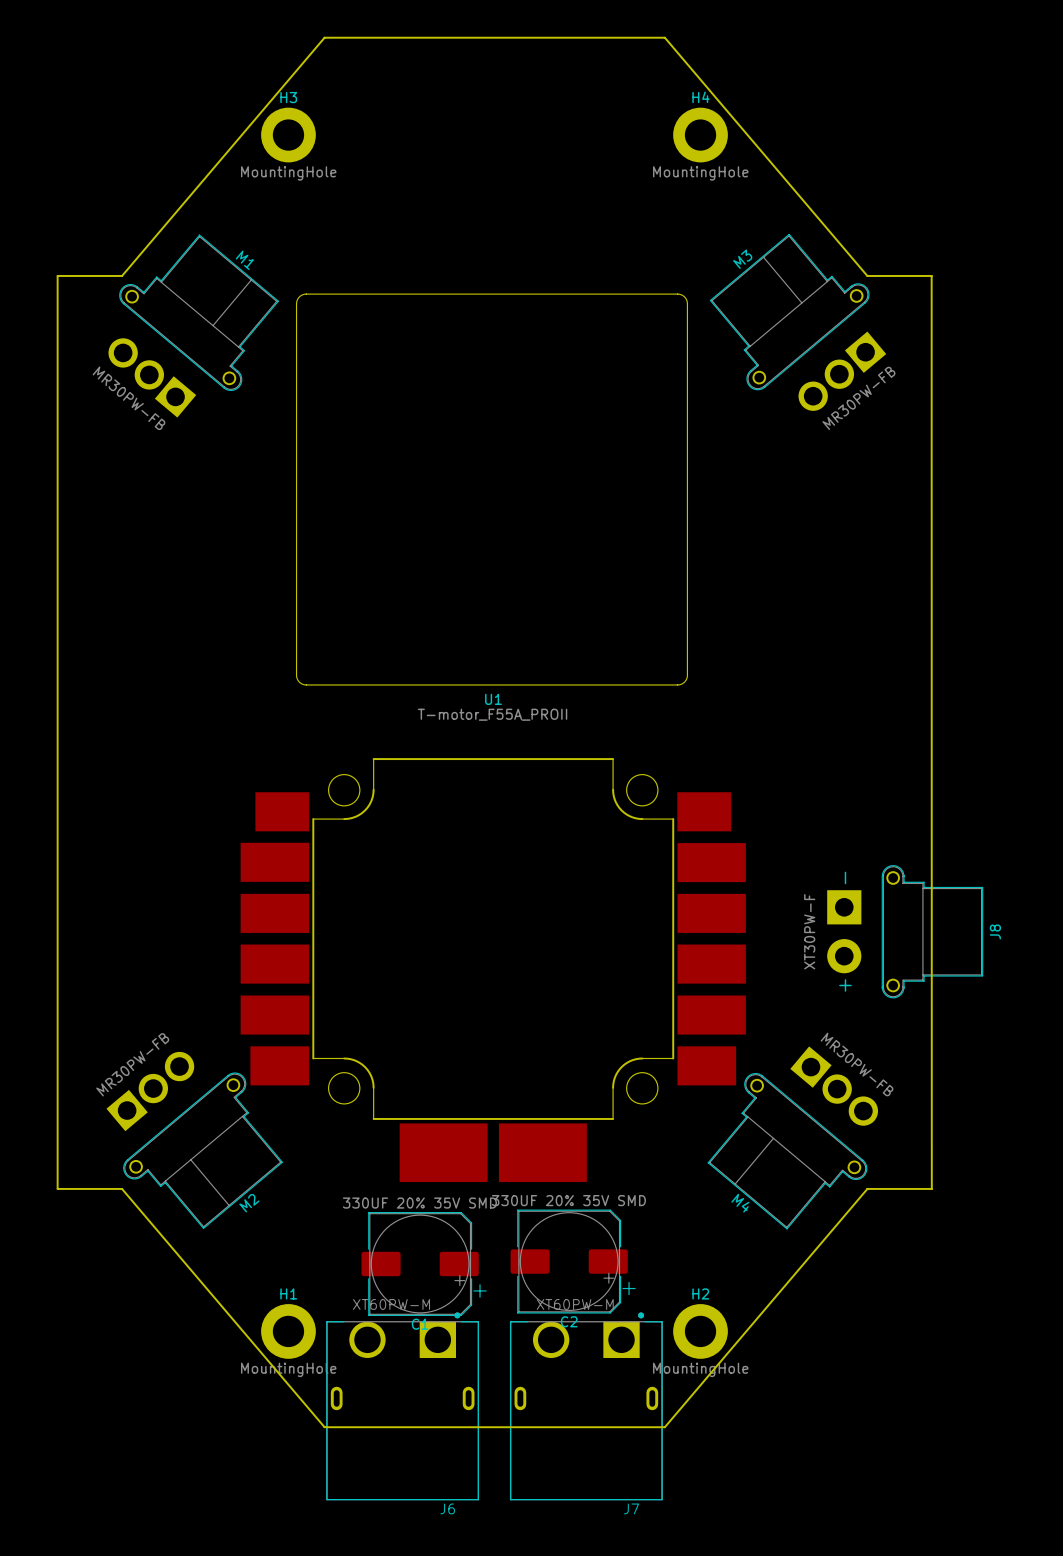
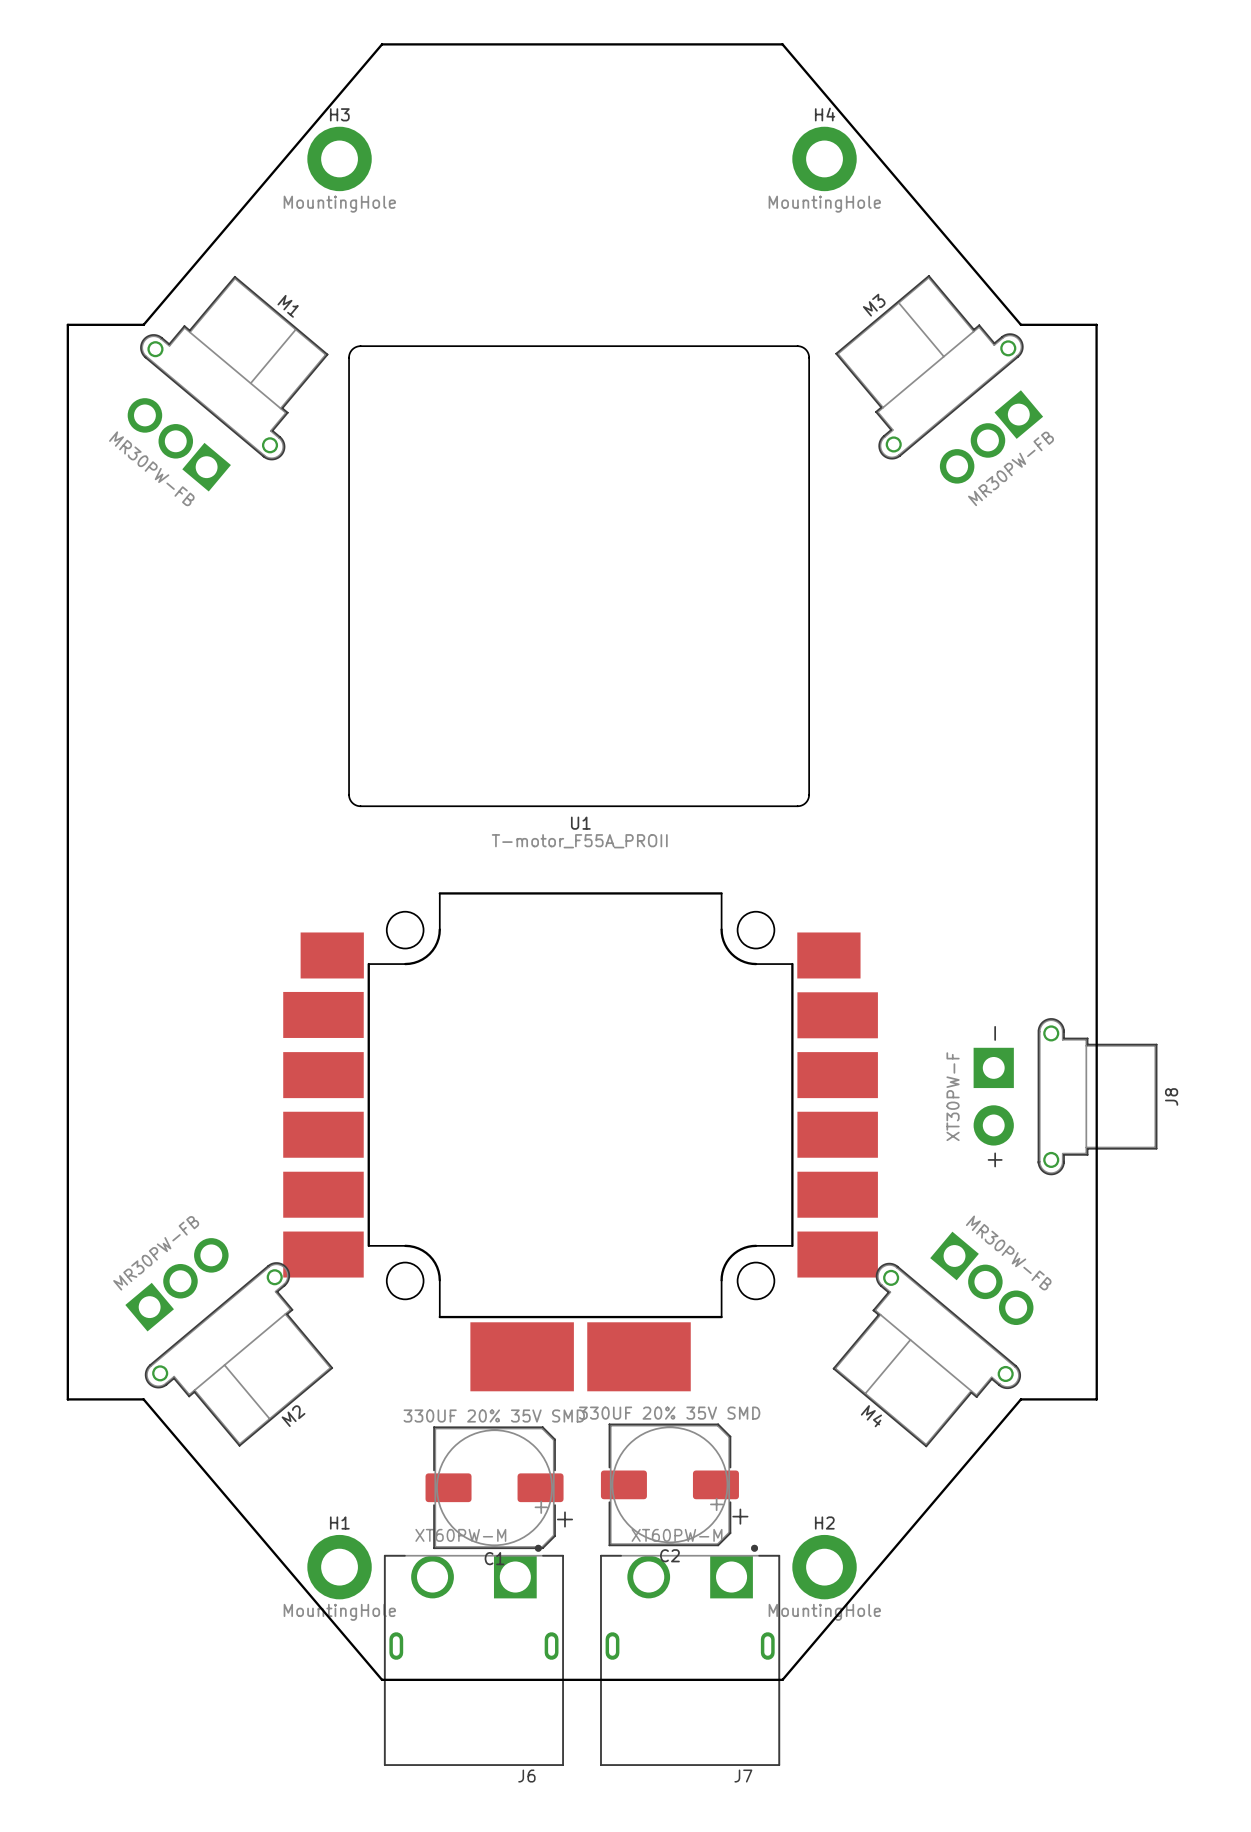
U1 footprint: [240, 774, 746, 1183] -> [283, 911, 878, 1392]

